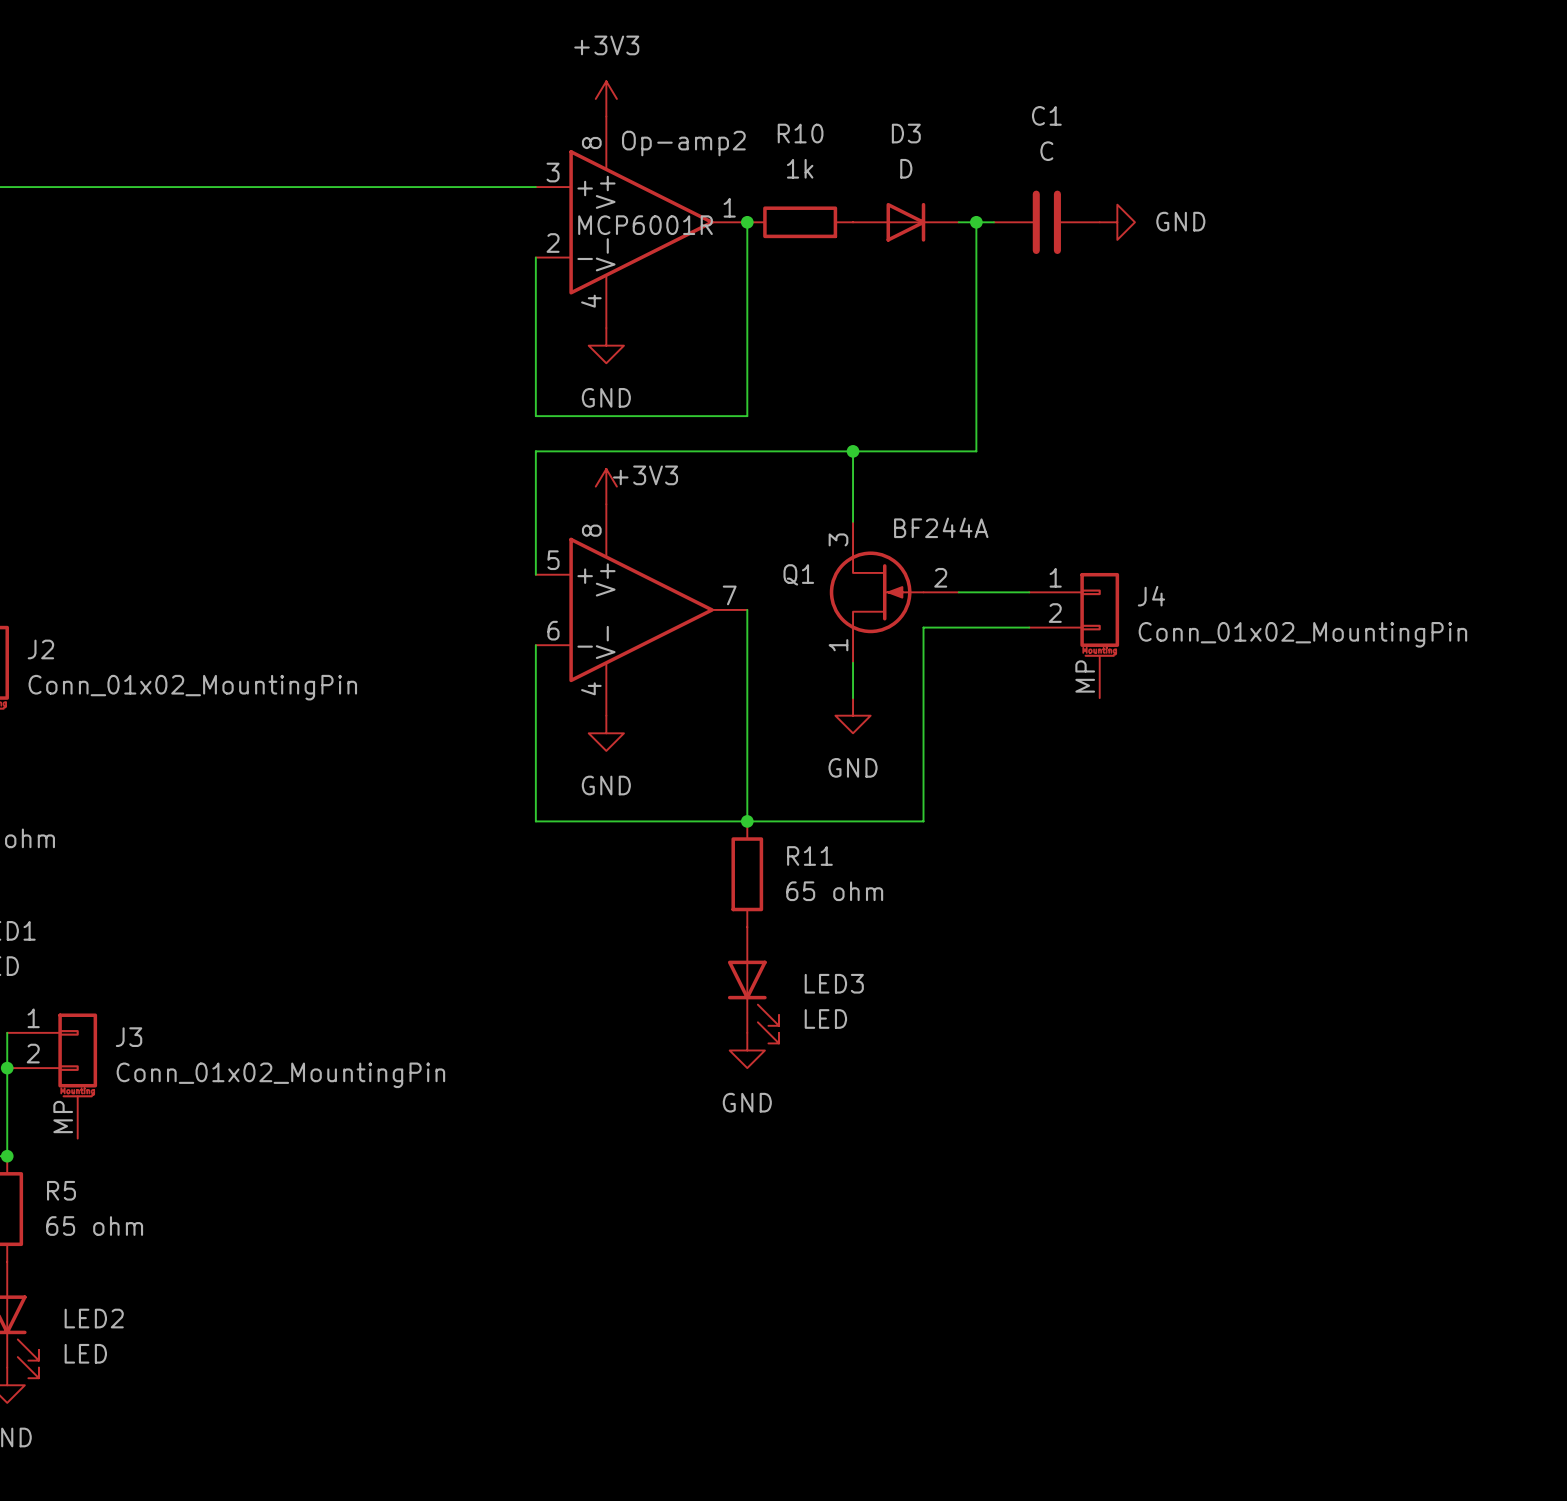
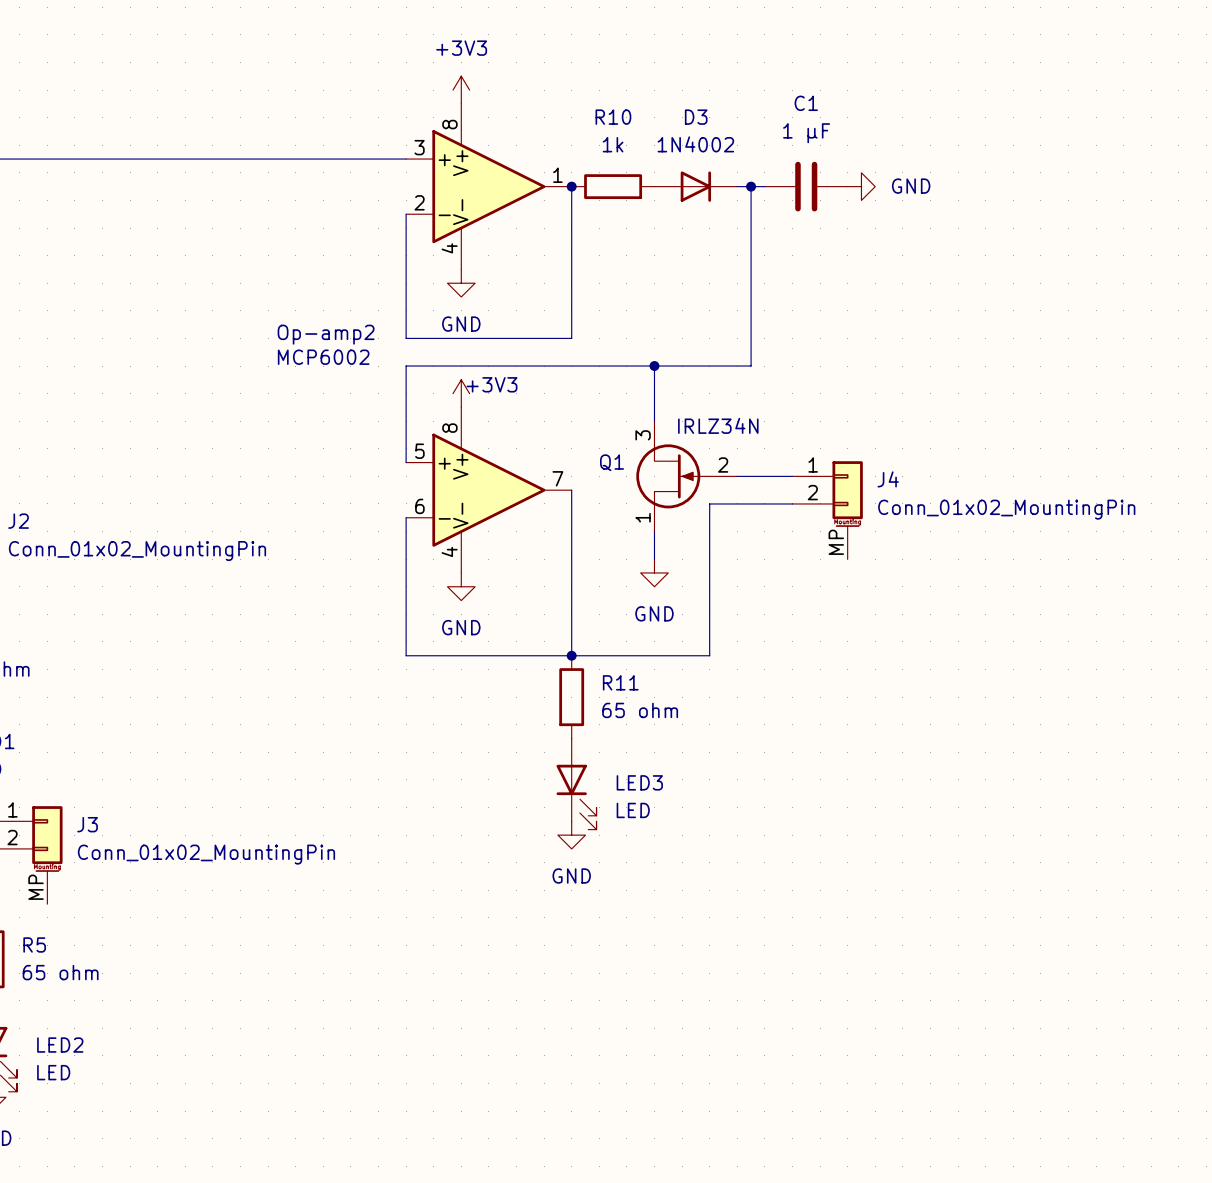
Op-amp2 name position: Op-amp2 (683, 143) -> Op-amp2 (326, 334)
C1 value: C (1046, 151) -> 1 μF (806, 133)
D3 value: D (906, 168) -> 1N4002 (695, 144)
Op-amp2 value: MCP6001R (645, 225) -> MCP6002 (323, 357)
Q1 value: BF244A (941, 527) -> IRLZ34N (718, 425)

